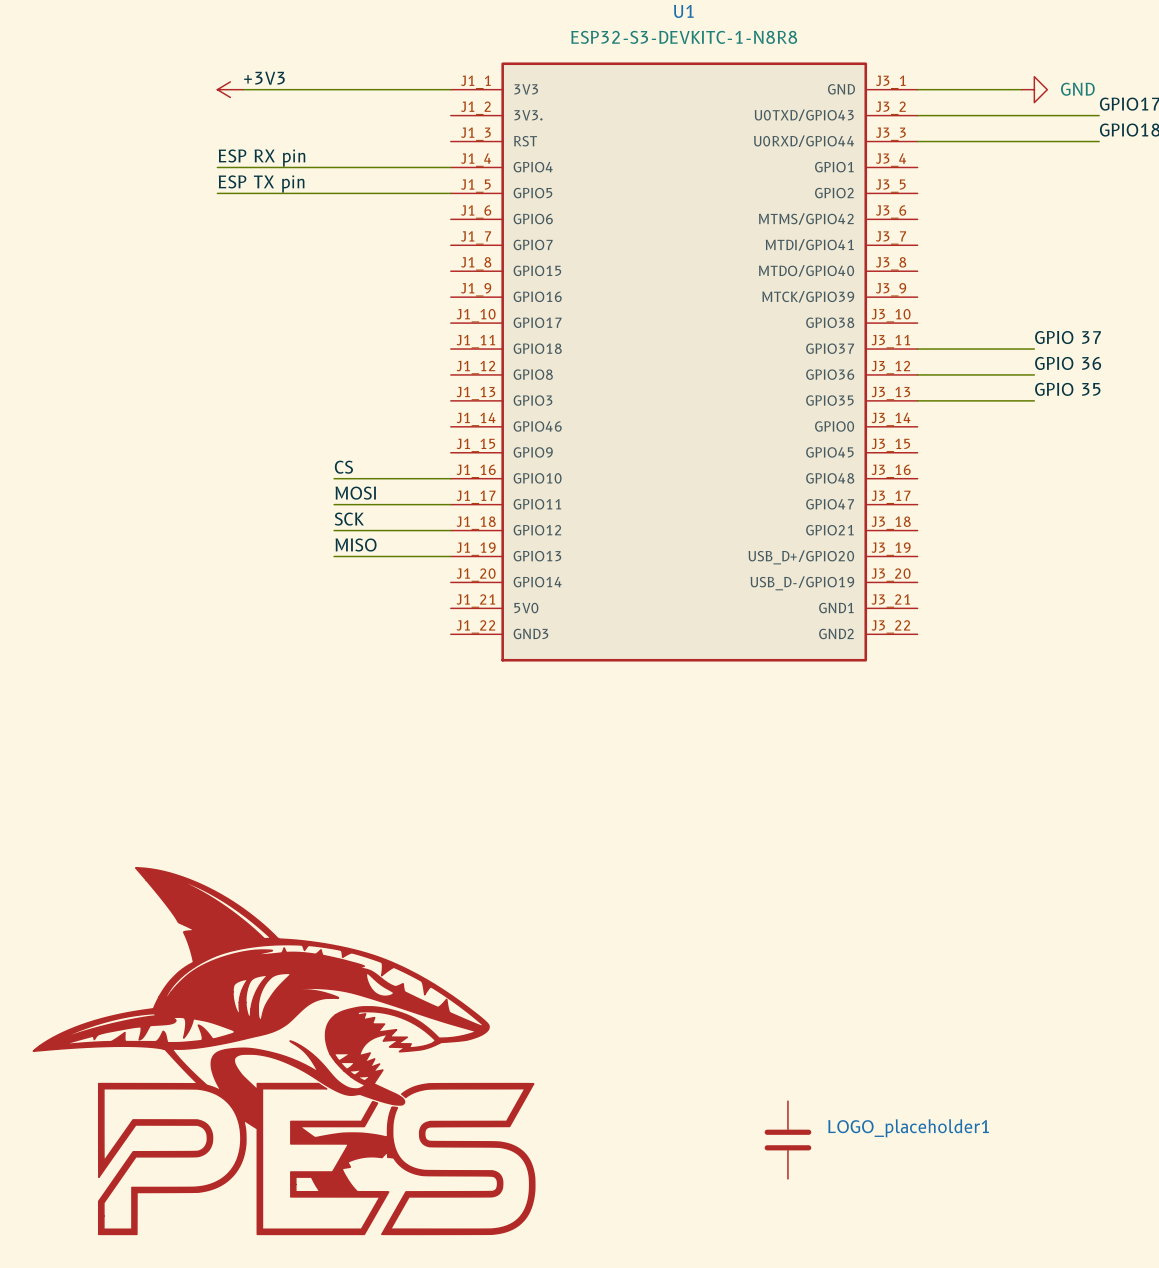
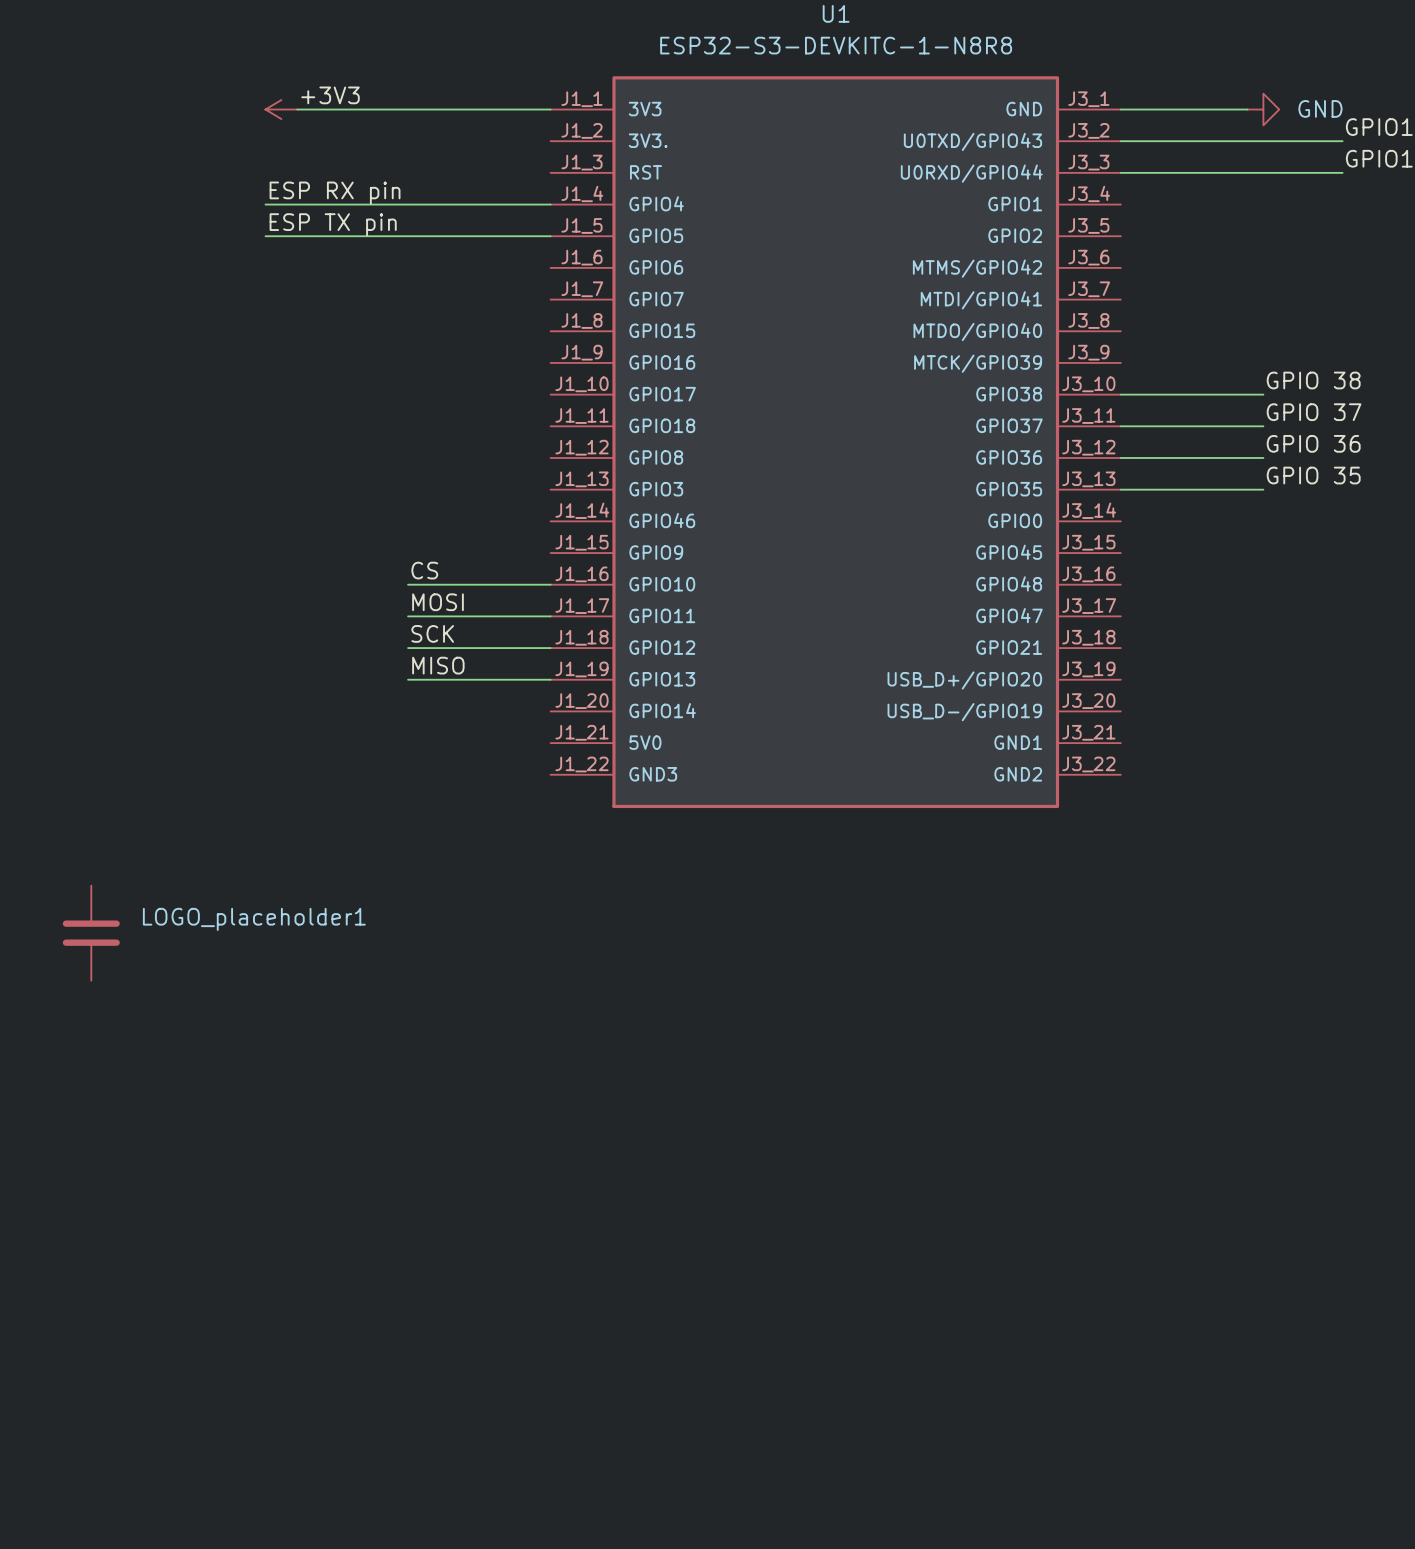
label: none -> GPIO 38 (1313, 380)
wire: none -> (1120, 394) (1263, 394)
power symbol: (284, 1051) -> none
LOGO_placeholder1 position: (787, 1140) -> (91, 933)

